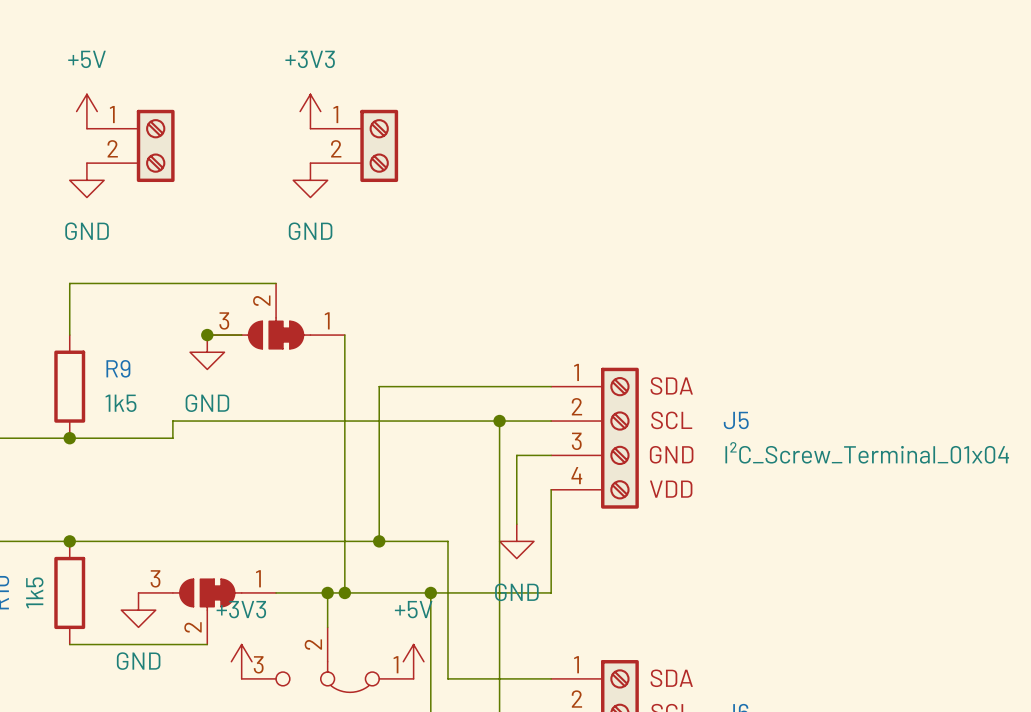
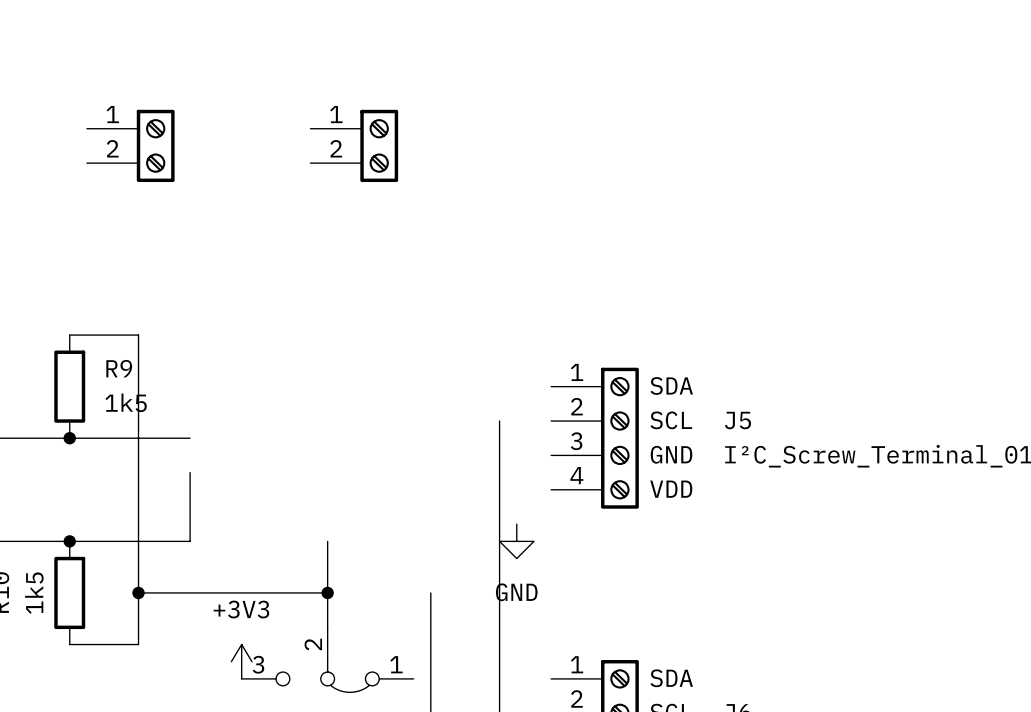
power symbol: +5V (86, 111) -> none
power symbol: +3V3 (310, 111) -> none
power symbol: GND (86, 180) -> none
power symbol: GND (310, 180) -> none
wire: (276, 283) (69, 283) (69, 335) -> none
part: (276, 316) -> none
wire: (207, 335) (241, 335) -> none
junction: (207, 335) -> none
wire: (344, 335) (344, 592) -> none
power symbol: GND (207, 352) -> none
wire: (551, 386) (379, 386) (379, 541) -> none
junction: (499, 421) -> none
wire: (551, 421) (172, 421) (172, 438) -> (190, 438) (172, 438)
wire: (551, 455) (516, 455) (516, 524) -> none
wire: (551, 489) (551, 592) (327, 592) -> (327, 541) (327, 592)
wire: (190, 541) (448, 541) (448, 678) (551, 678) -> (190, 541) (190, 472)
junction: (379, 541) -> none
junction: none -> (138, 592)
junction: (344, 592) -> none
junction: (430, 592) -> none
power symbol: GND (138, 610) -> none
part: (207, 611) -> none
wire: (138, 644) (207, 644) -> (138, 644) (138, 335) (69, 335)
power symbol: +5V (413, 661) -> none

